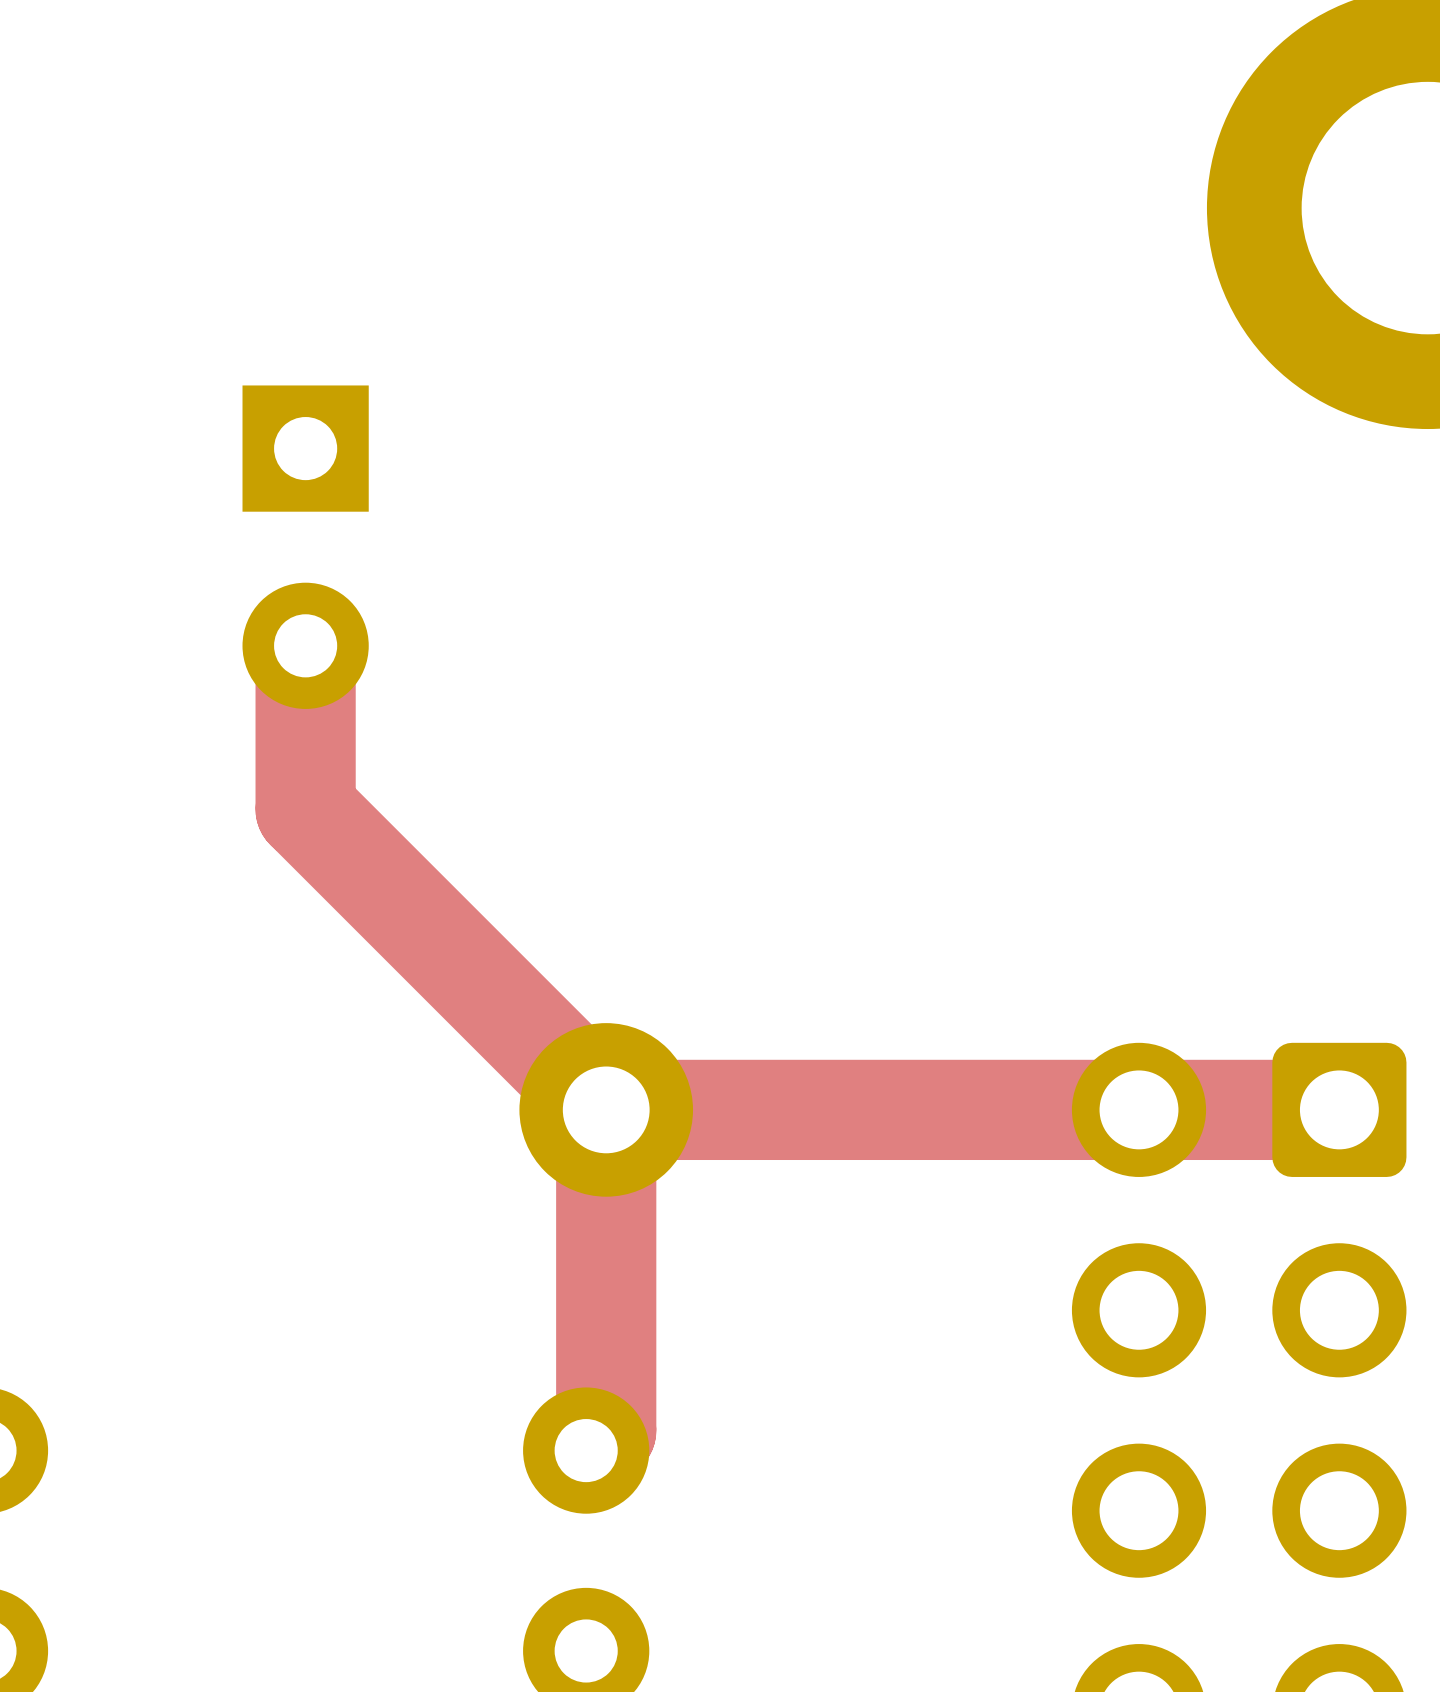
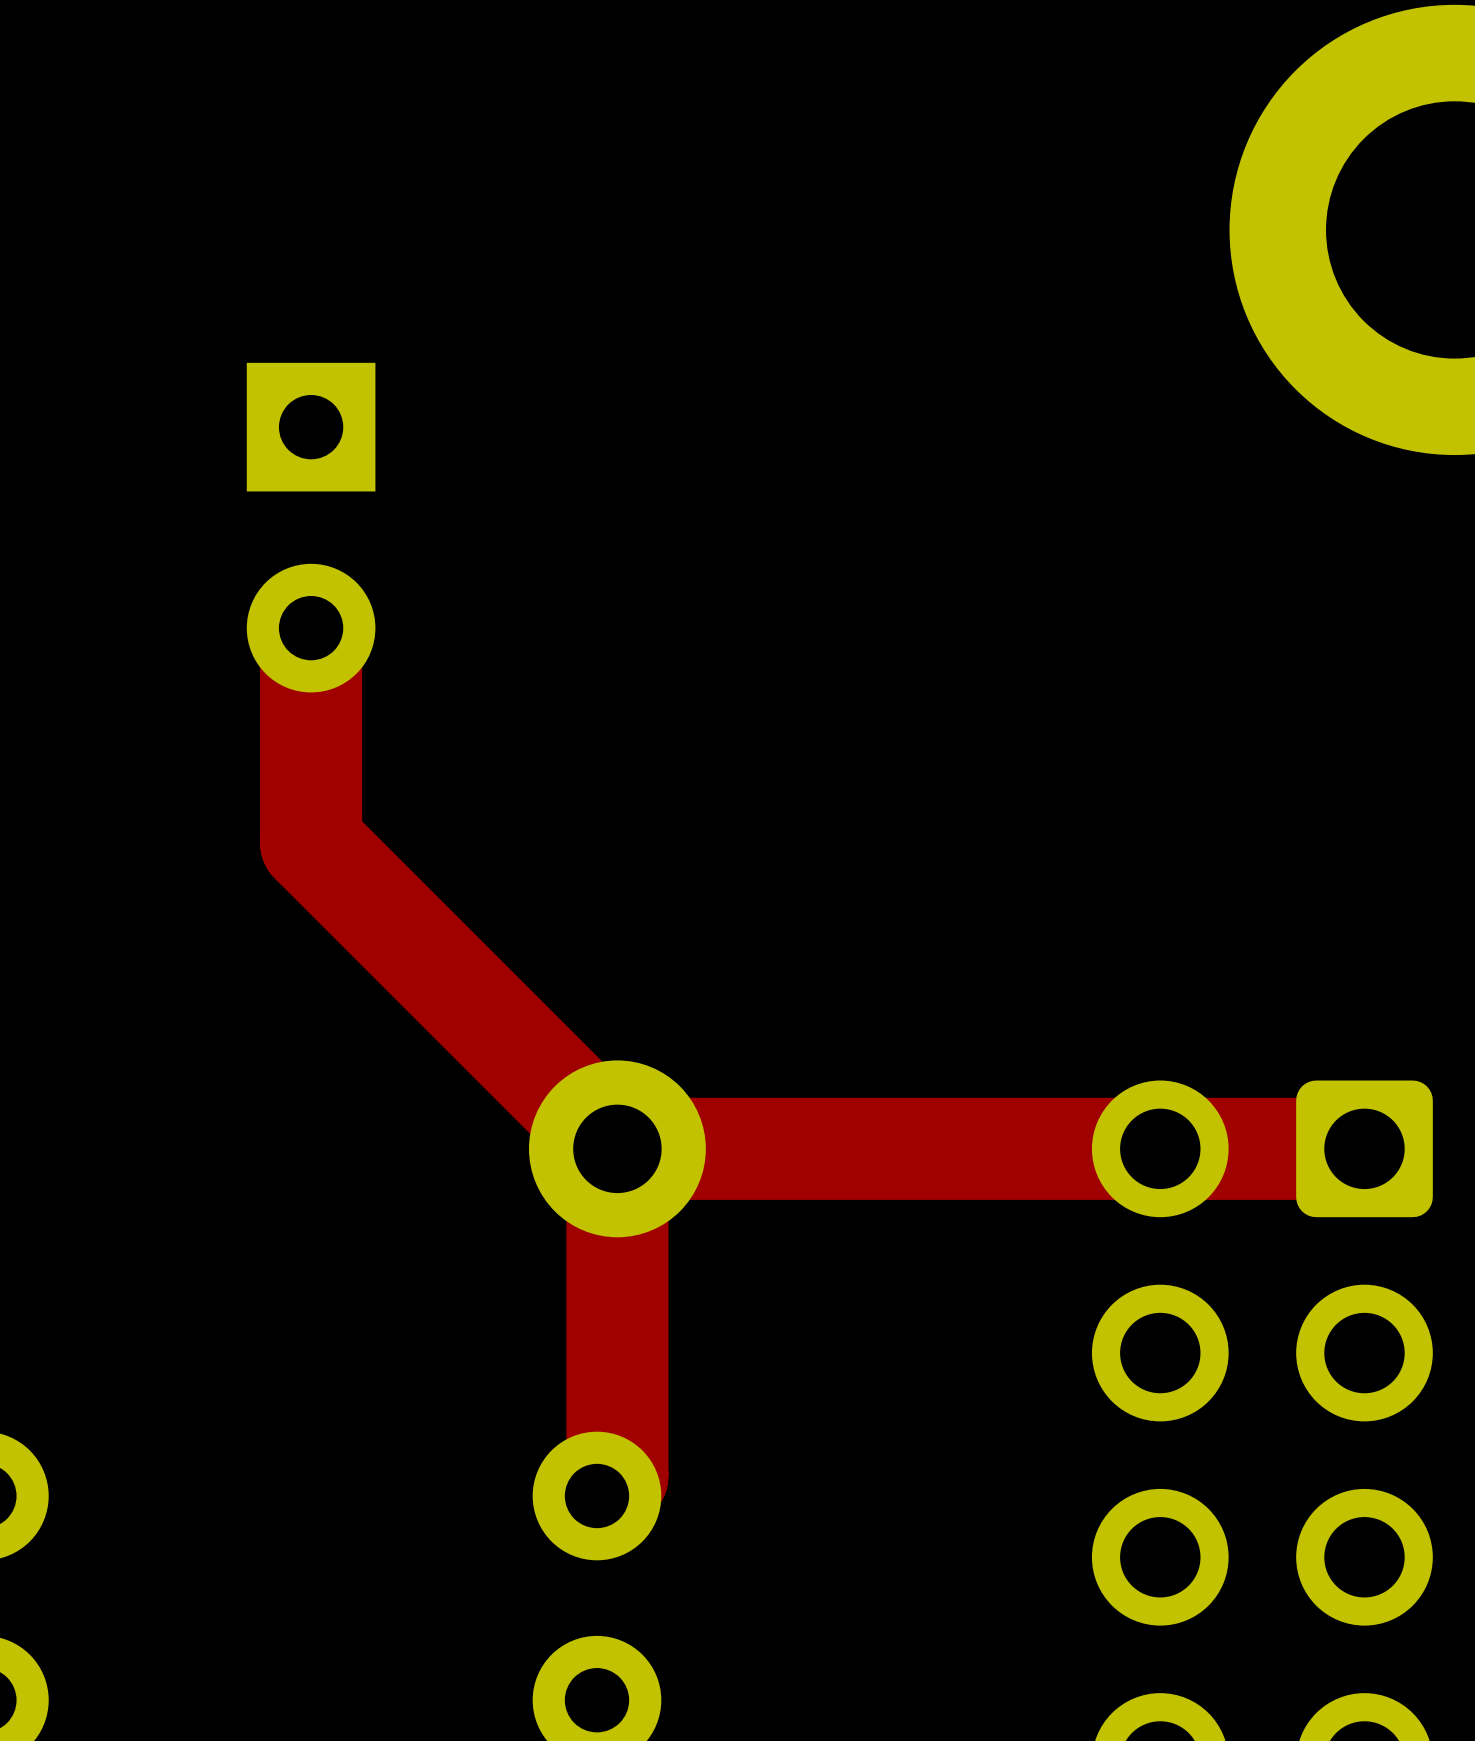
part position: (305, 547) -> (311, 527)

